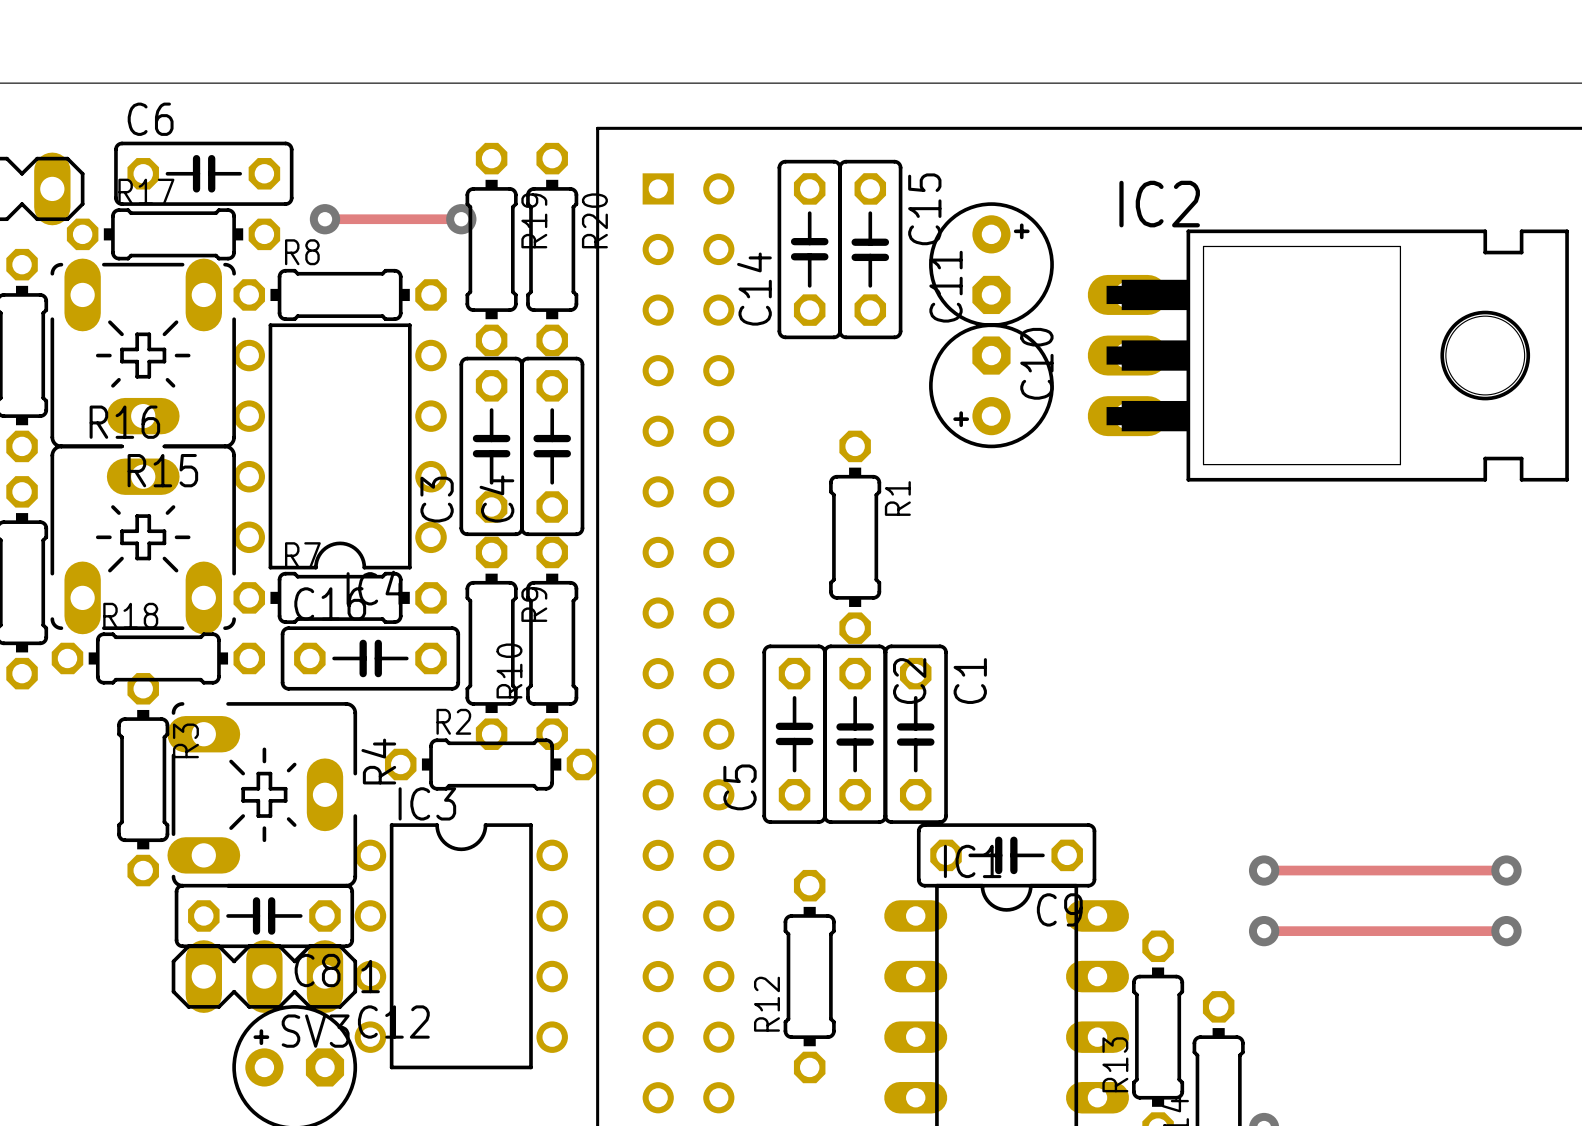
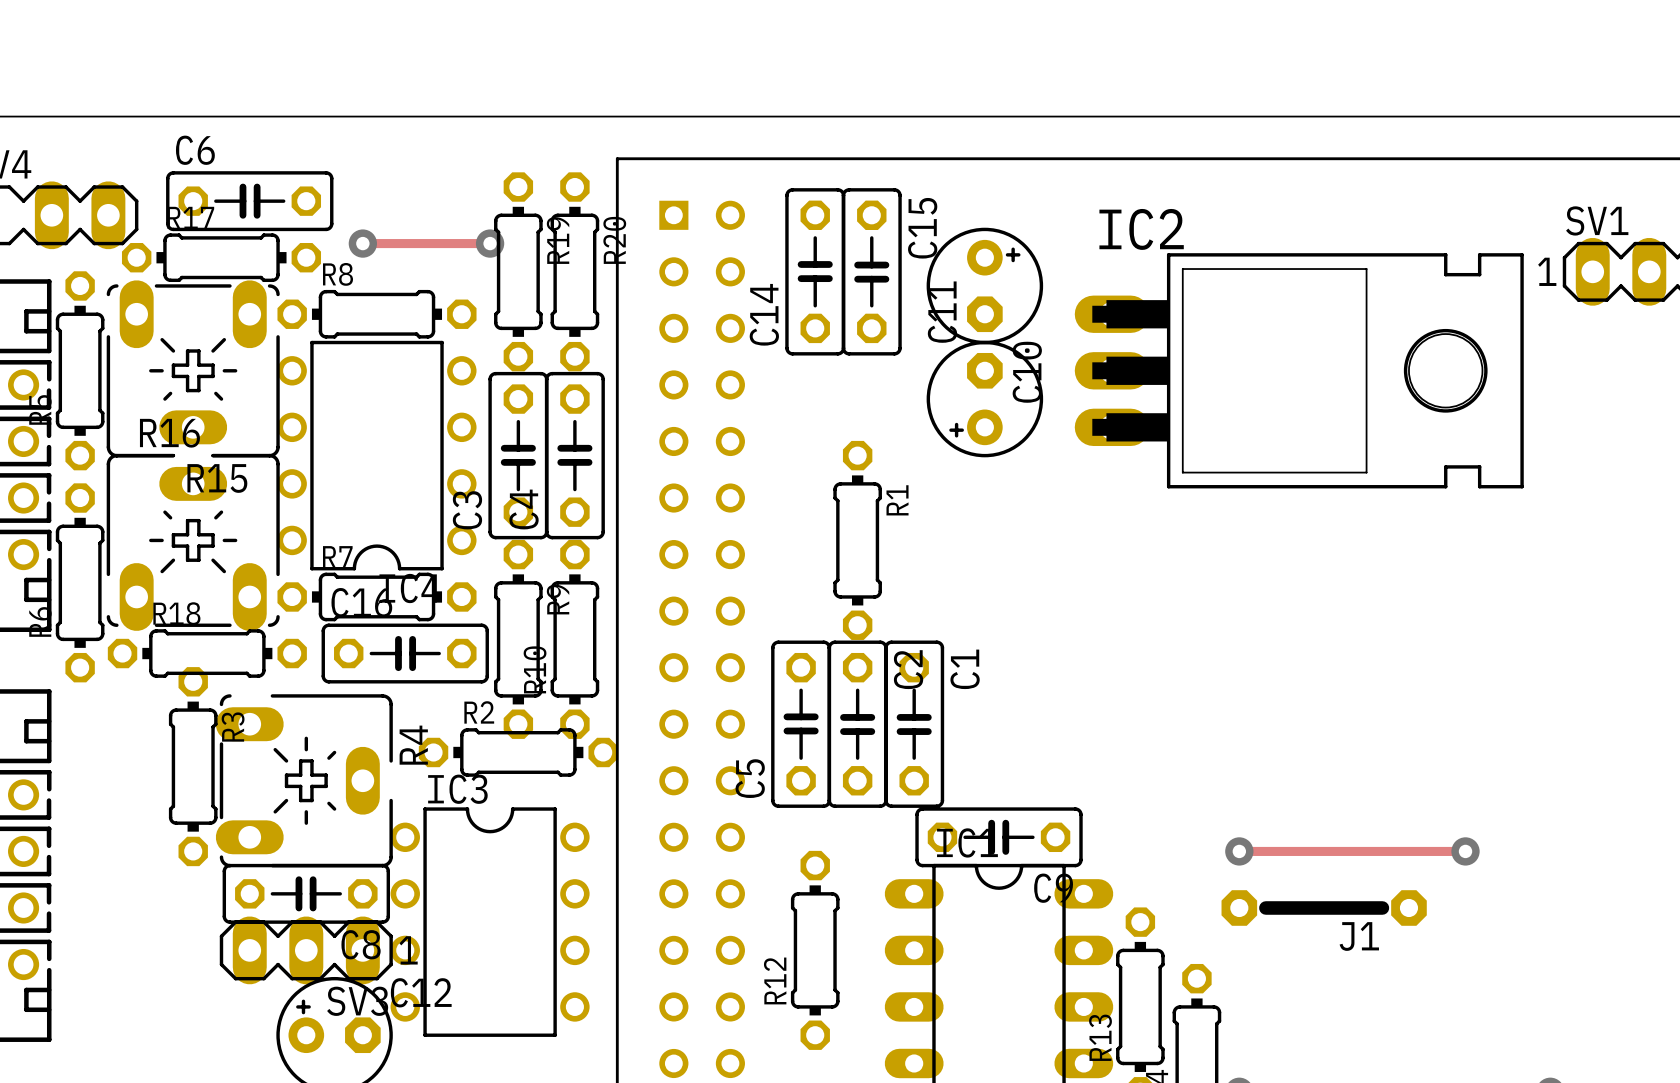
track: (1264, 931) (1506, 931) -> none
via: (1264, 931) -> none
J1: none -> (1324, 907)
via: (1506, 931) -> none

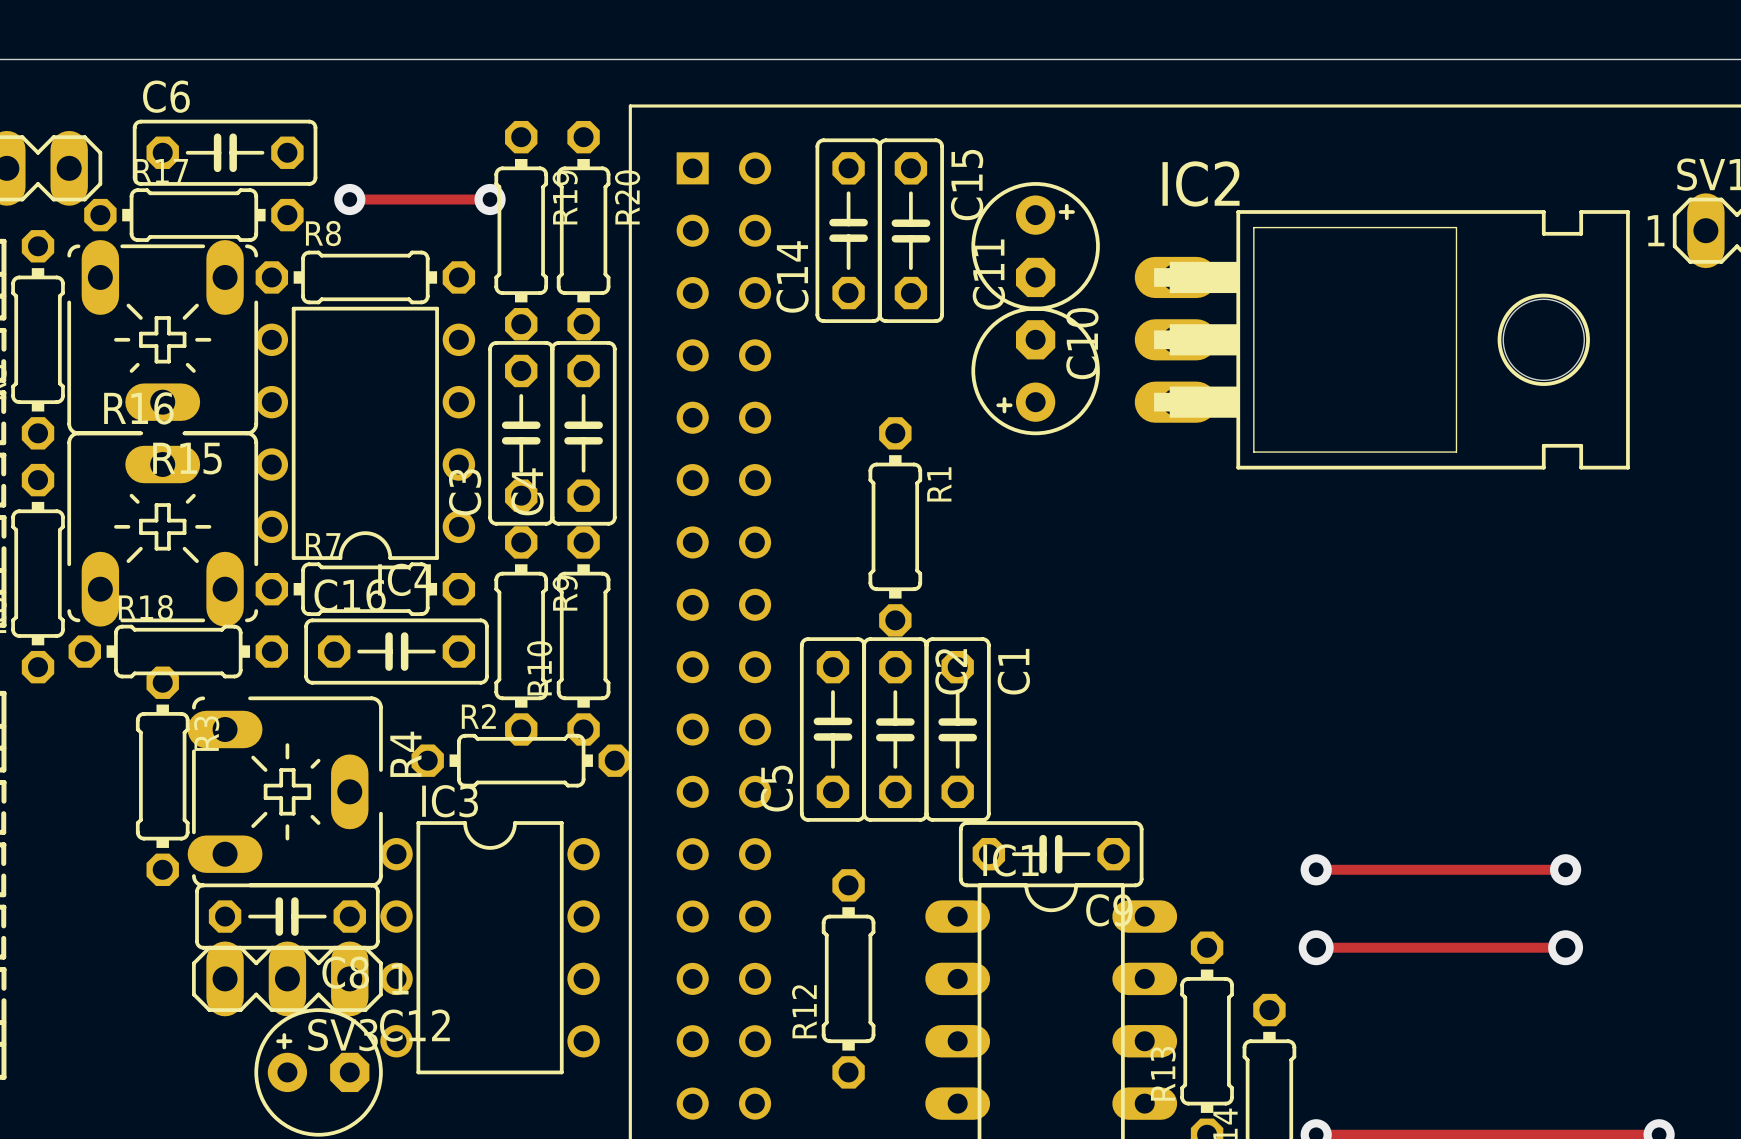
J1: (1324, 907) -> none
track: none -> (1316, 947) (1565, 947)
via: none -> (1316, 947)
via: none -> (1565, 947)

